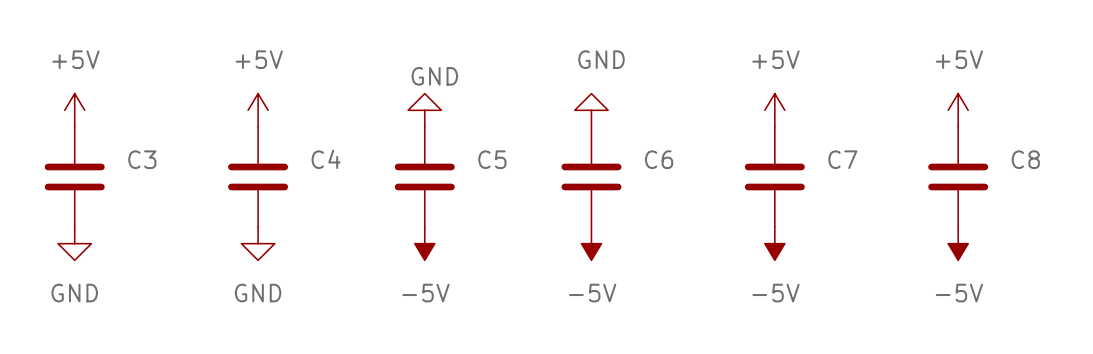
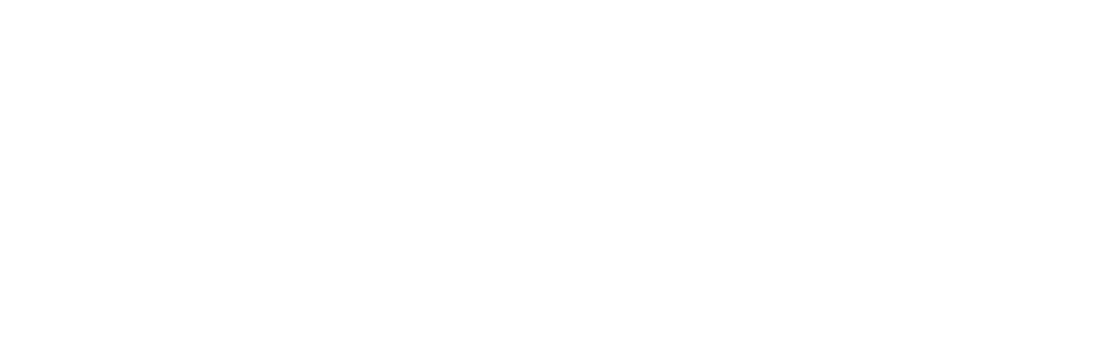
power symbol: +5V (74, 110) -> none
power symbol: +5V (258, 110) -> none
power symbol: GND (424, 110) -> none
power symbol: GND (591, 110) -> none
power symbol: +5V (774, 110) -> none
power symbol: +5V (958, 110) -> none
C3: (74, 176) -> none
C4: (258, 176) -> none
C5: (424, 176) -> none
C6: (591, 176) -> none
C7: (774, 176) -> none
C8: (958, 176) -> none
power symbol: GND (74, 243) -> none
power symbol: GND (258, 243) -> none
power symbol: -5V (424, 243) -> none
power symbol: -5V (591, 243) -> none
power symbol: -5V (774, 243) -> none
power symbol: -5V (958, 243) -> none

